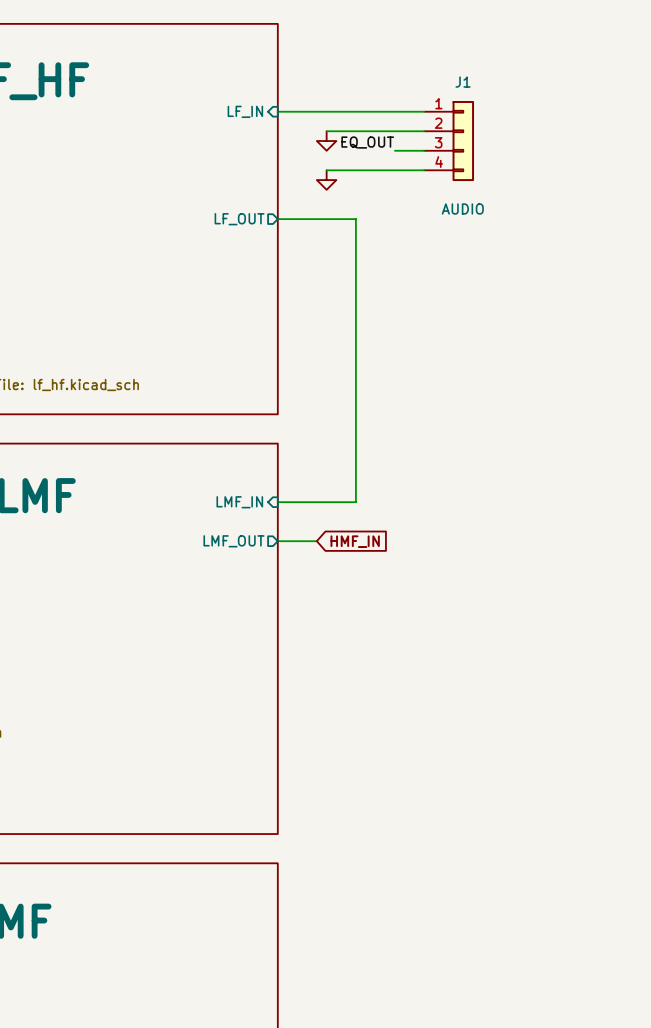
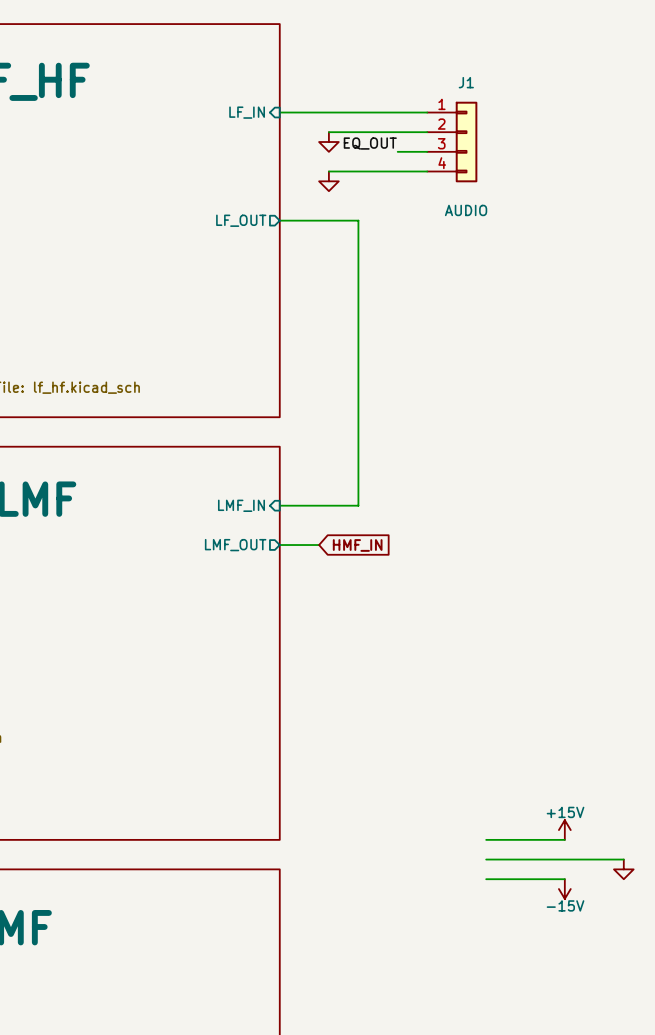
power symbol: none -> +15V (564, 830)
wire: none -> (486, 839) (564, 839)
wire: none -> (486, 859) (623, 859)
power symbol: none -> (623, 869)
wire: none -> (486, 879) (564, 879)
power symbol: none -> -15V (564, 889)

